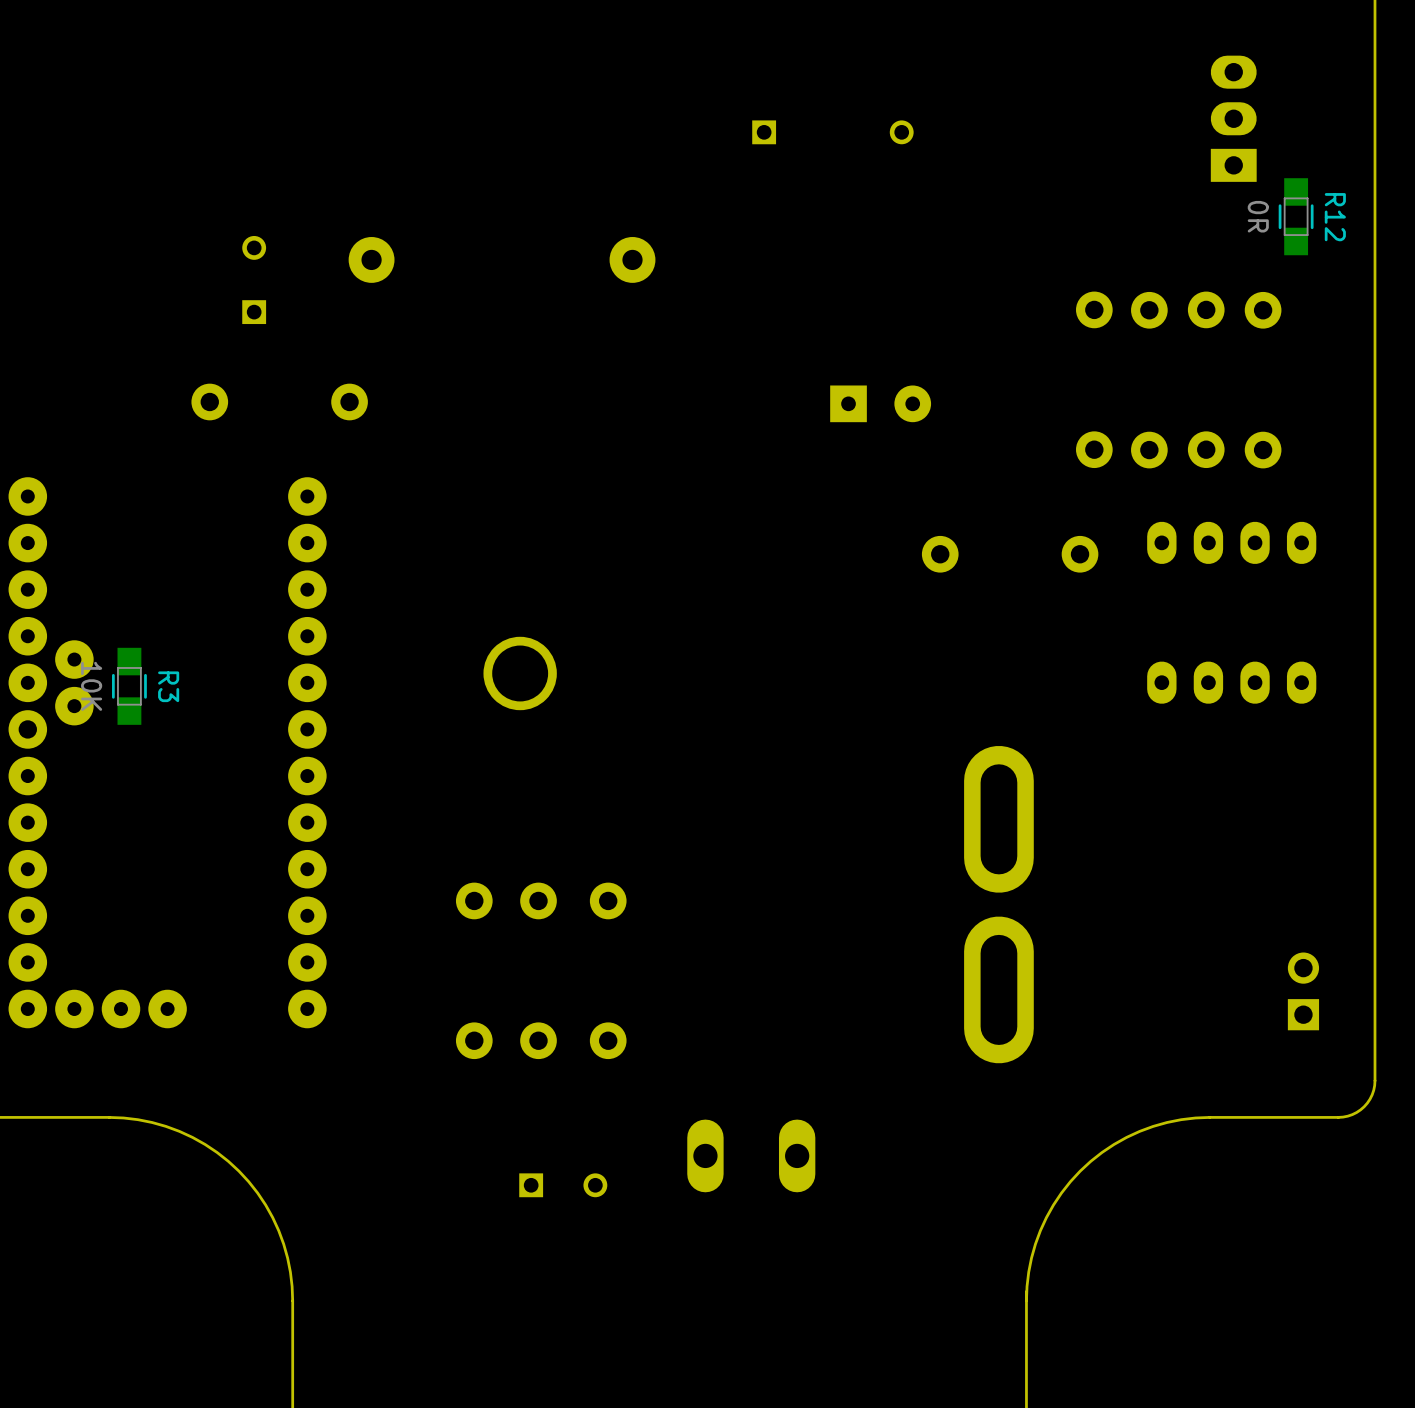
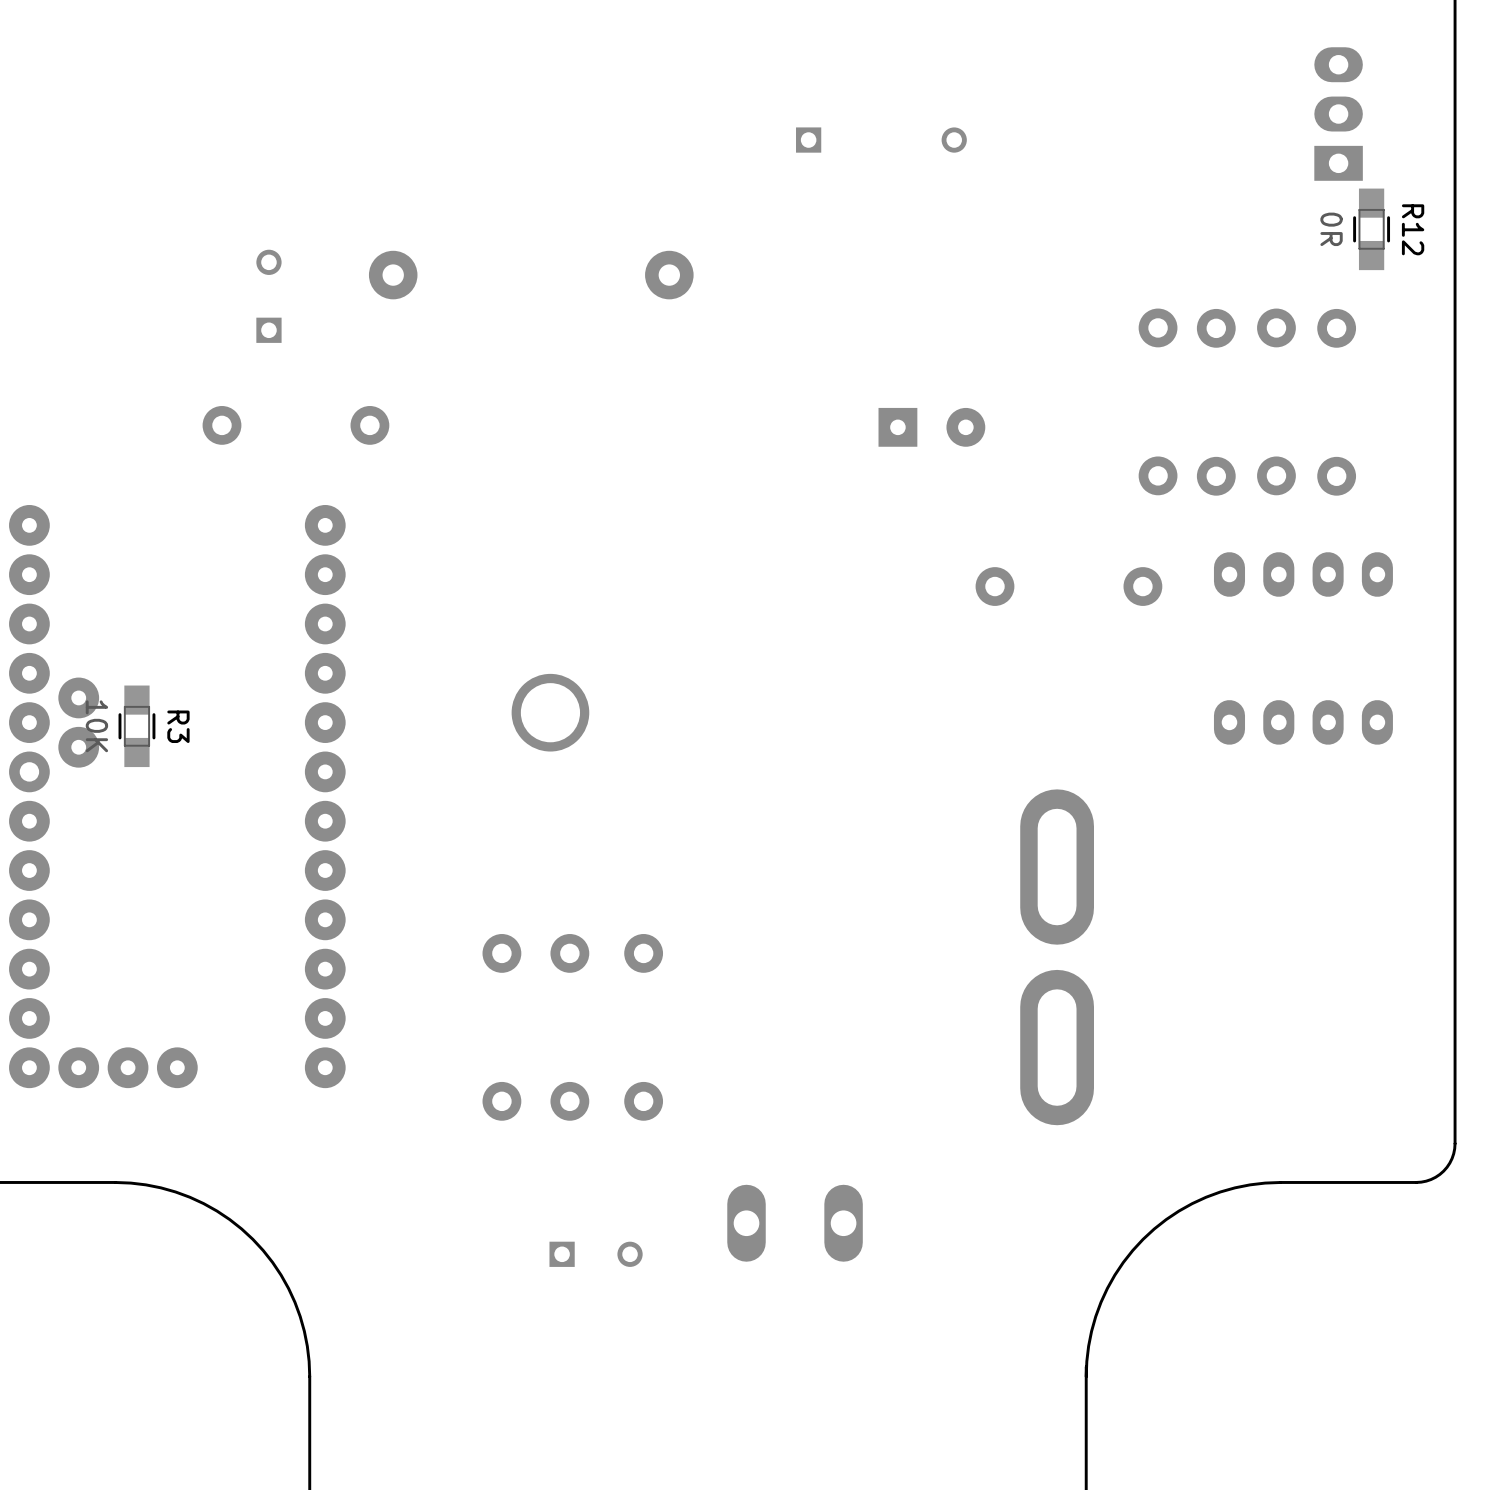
part position: (1233, 118) -> (1338, 114)
part: (1303, 991) -> none

